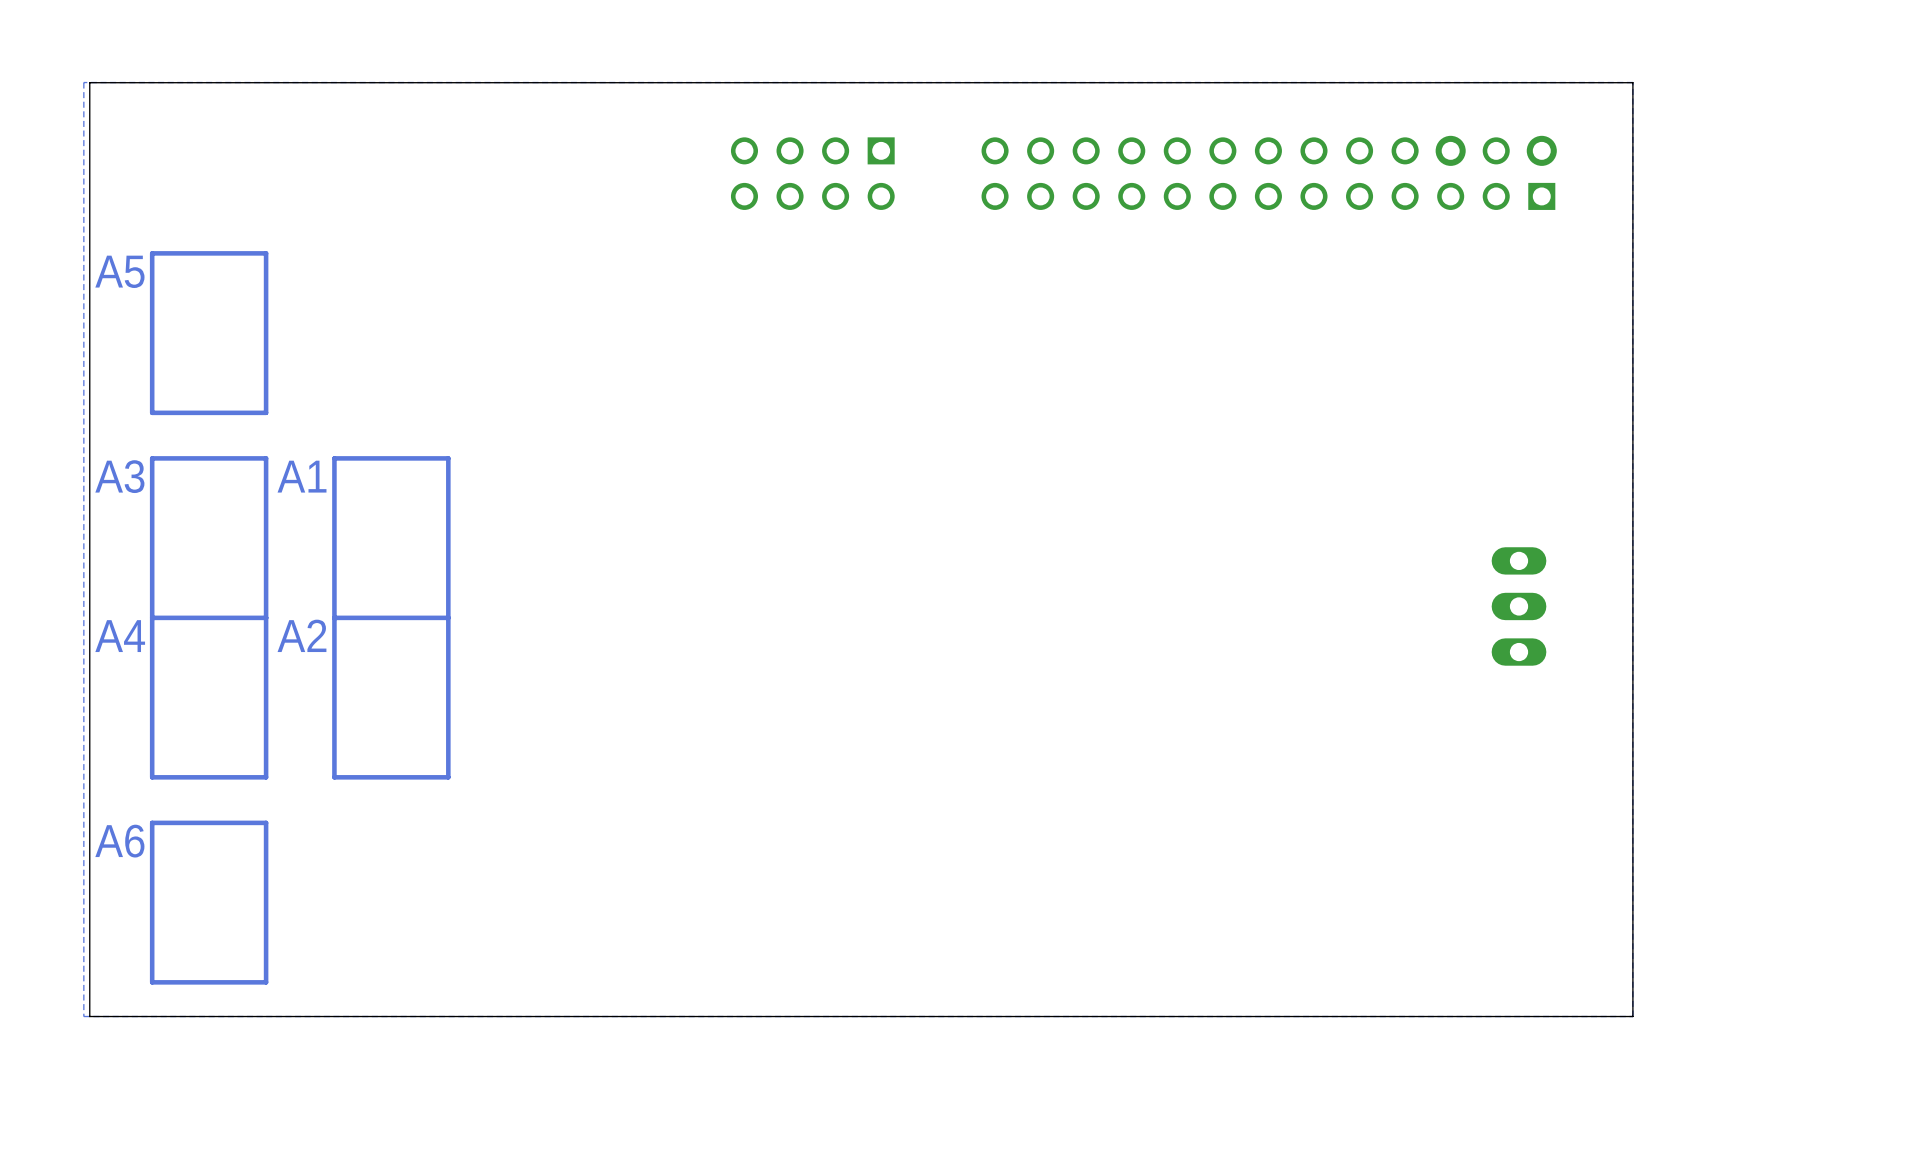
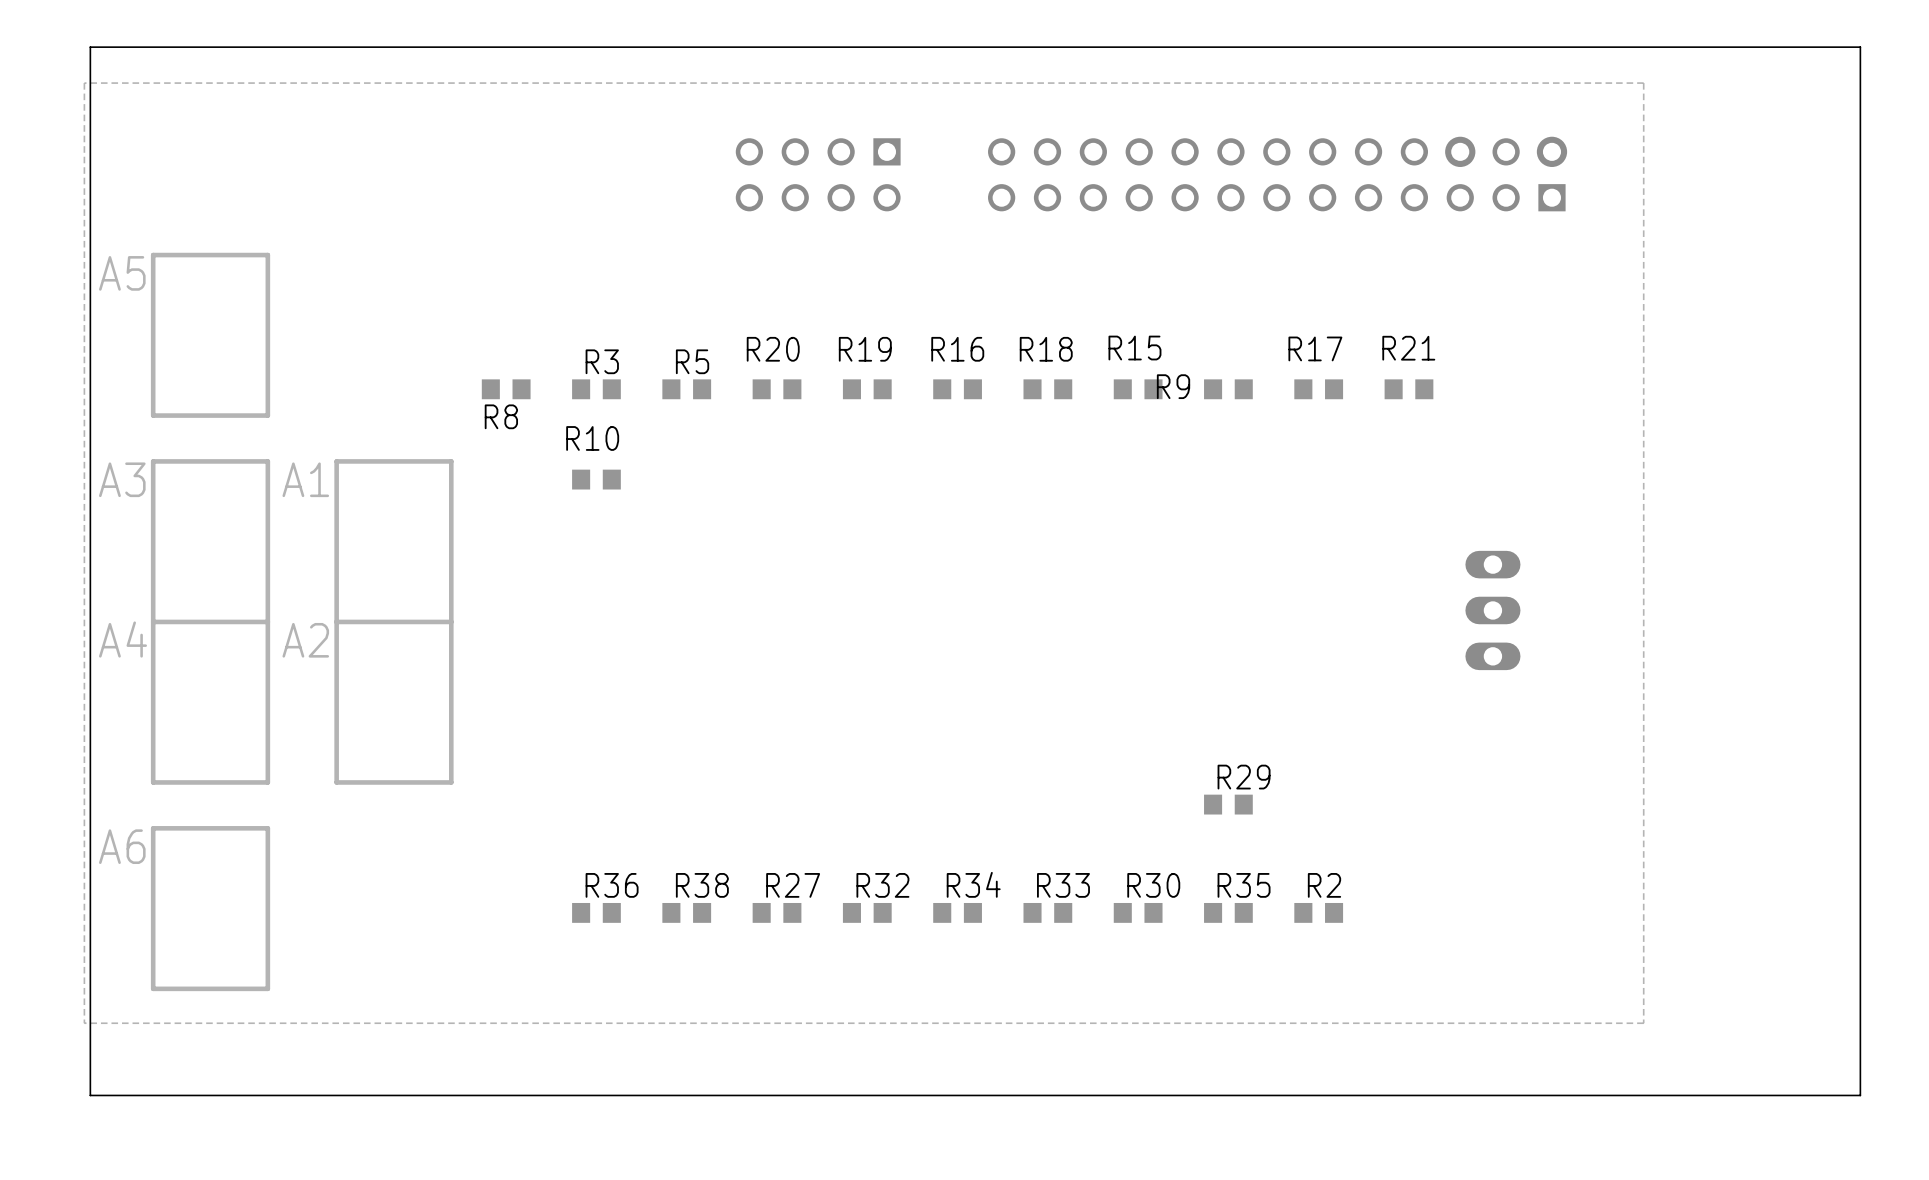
board edge: (89, 82) (1632, 82) (1632, 1016) (89, 1016) -> (90, 83) (90, 47) (1860, 47) (1860, 1095) (90, 1095) (90, 1023)
R8: none -> (506, 389)
R3: none -> (596, 389)
R5: none -> (686, 389)
R20: none -> (777, 389)
R19: none -> (867, 389)
R16: none -> (957, 389)
R18: none -> (1047, 389)
R15: none -> (1138, 389)
R9: none -> (1228, 389)
R17: none -> (1318, 389)
R21: none -> (1408, 389)
R10: none -> (596, 479)
part position: (1519, 606) -> (1492, 610)
R29: none -> (1228, 804)
R36: none -> (596, 912)
R38: none -> (686, 912)
R27: none -> (777, 912)
R32: none -> (867, 912)
R34: none -> (957, 912)
R33: none -> (1047, 912)
R30: none -> (1138, 912)
R35: none -> (1228, 912)
R2: none -> (1318, 912)

